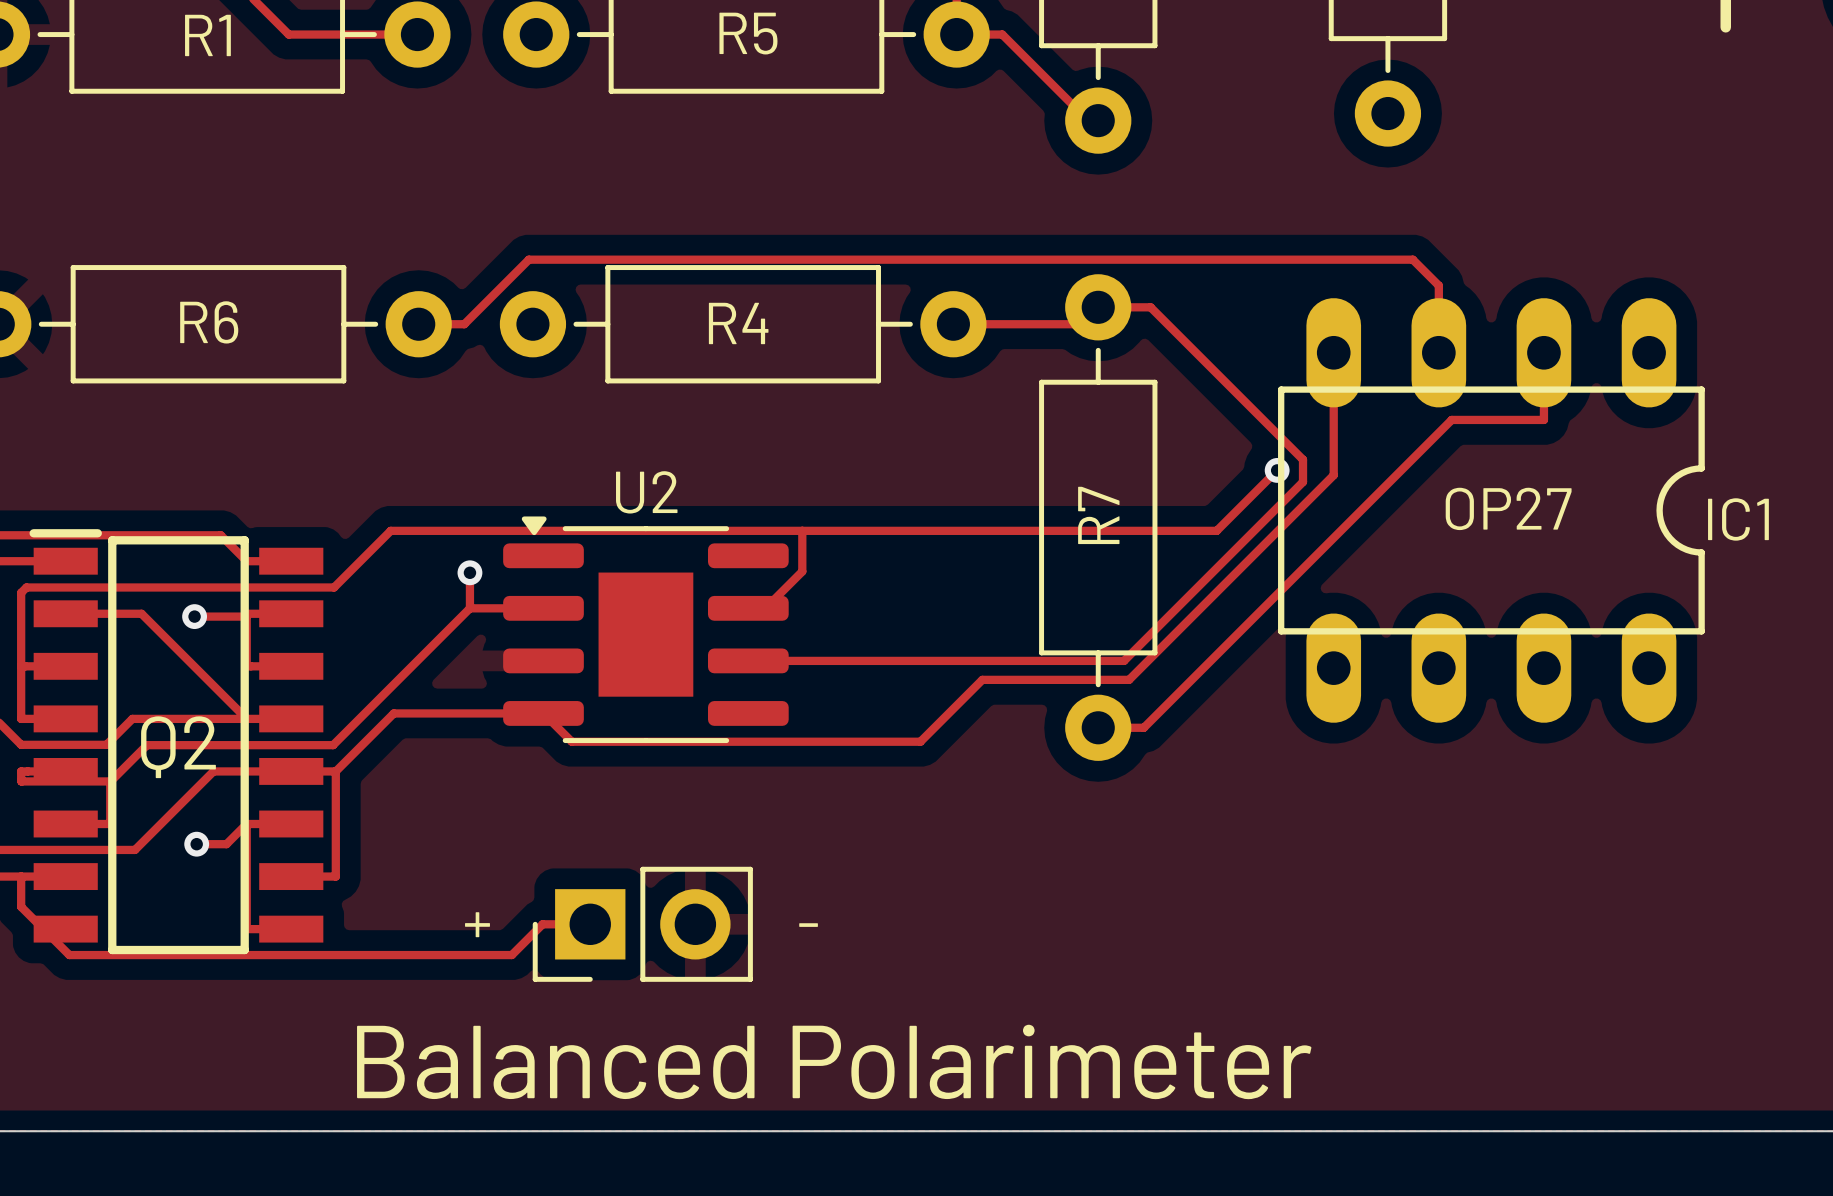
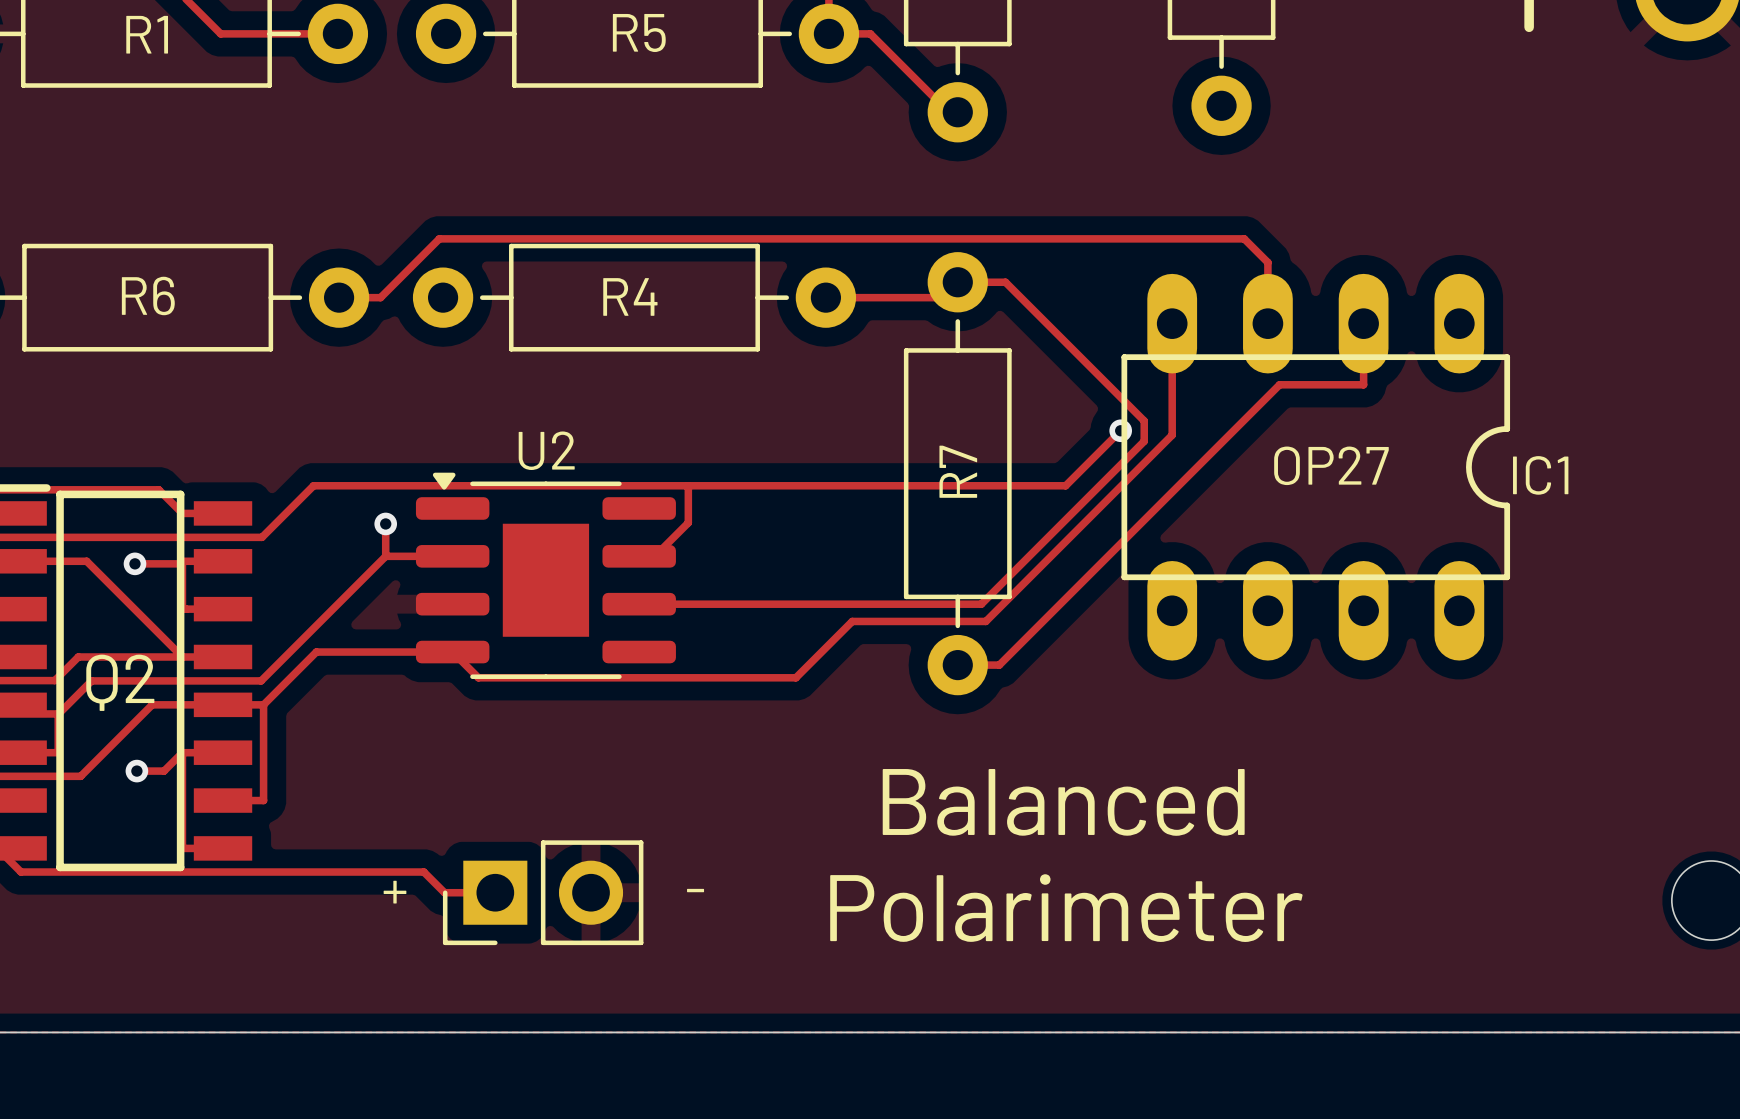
text: none -> Balanced (1063, 802)
text position: + (477, 924) -> + (395, 892)
track: (590, 924) (542, 924) (511, 955) -> (495, 892) (444, 892) (423, 872)
part position: (642, 924) -> (543, 892)
text position: - (808, 925) -> - (695, 890)
text: Balanced Polarimeter (834, 1061) -> Polarimeter (1066, 908)

